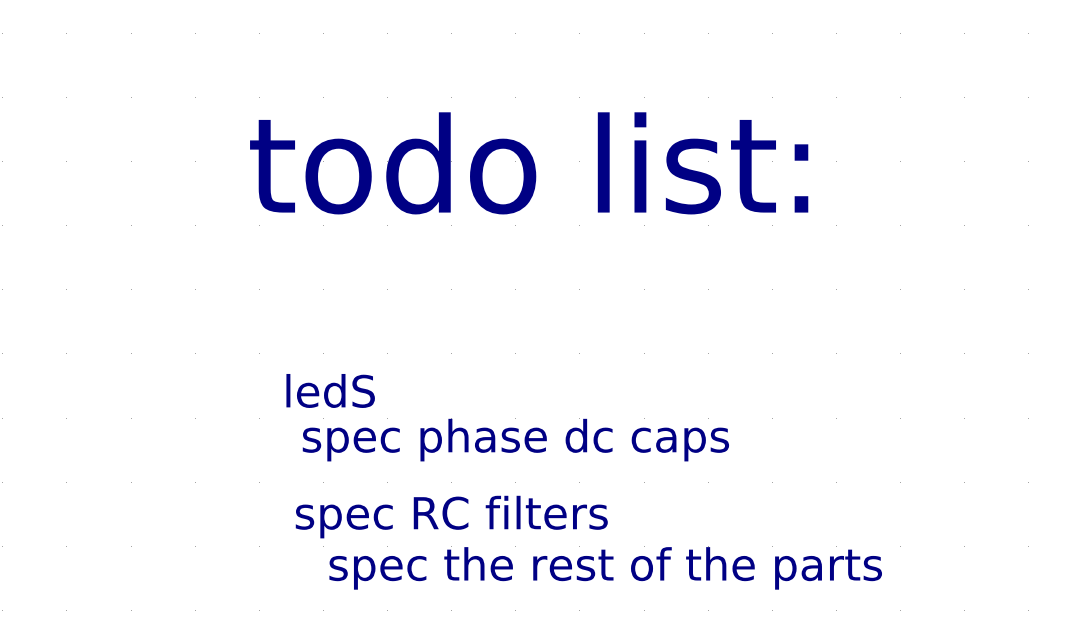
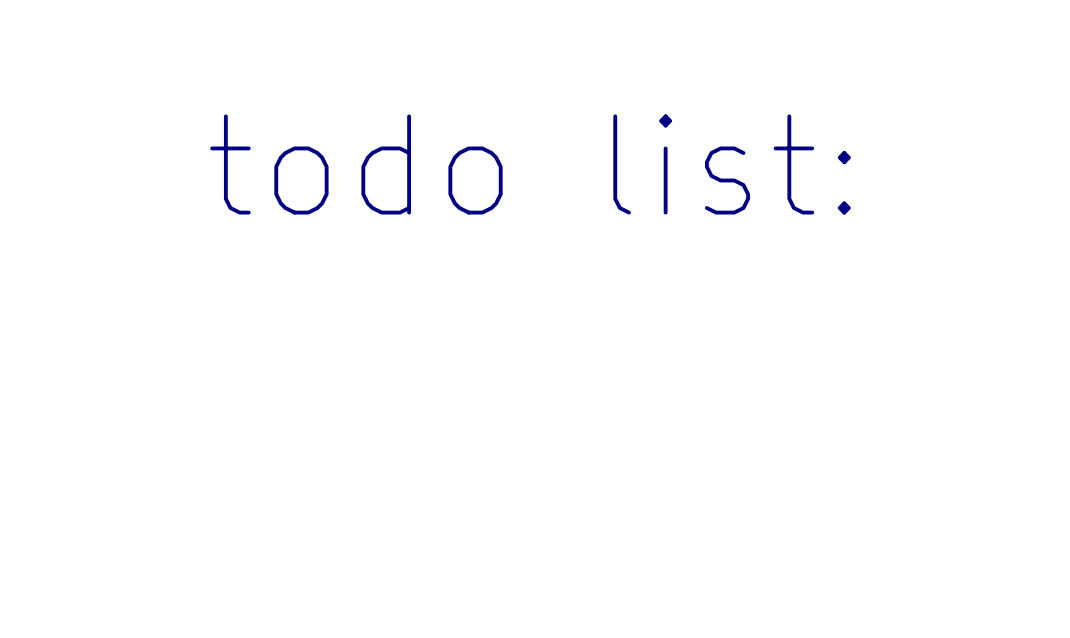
text: ledS (330, 390) -> none
text: spec phase dc caps (515, 440) -> none
text: spec RC filters (451, 517) -> none
text: spec the rest of the parts (605, 568) -> none

